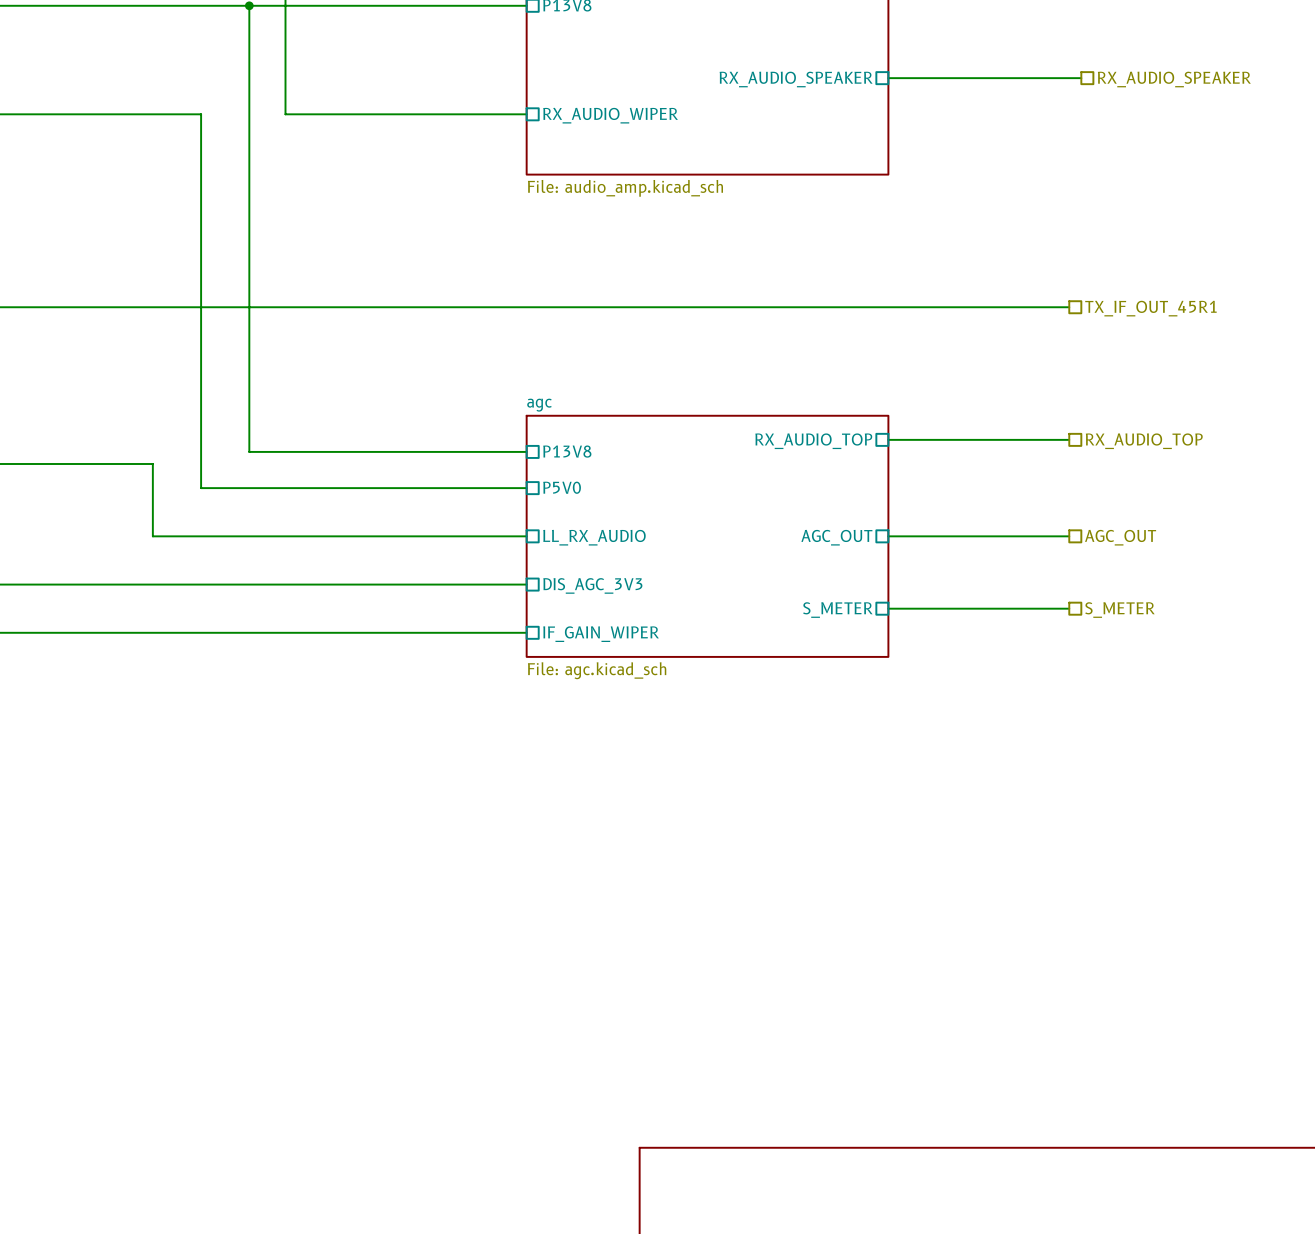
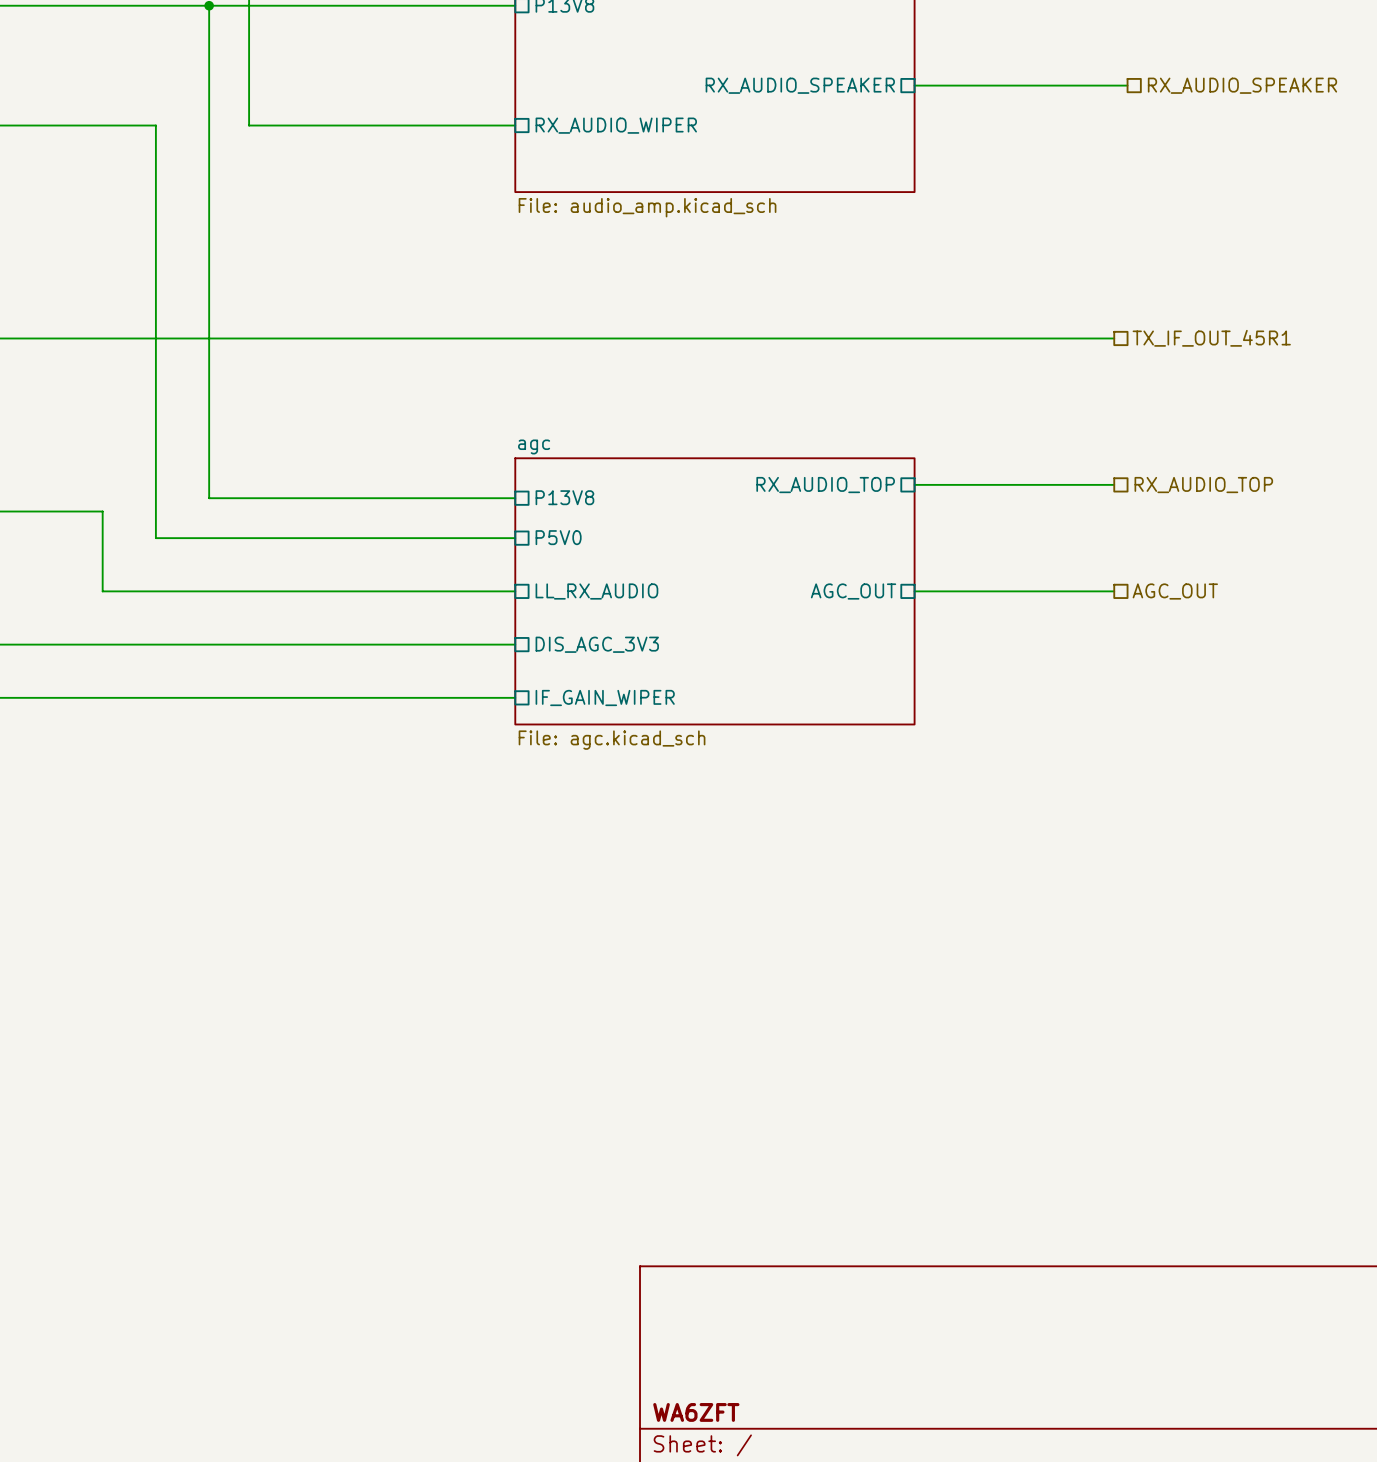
wire: (888, 608) (1069, 608) -> none
sheet pin: S_METER (837, 610) -> none
hierarchical label: S_METER (1119, 610) -> none

